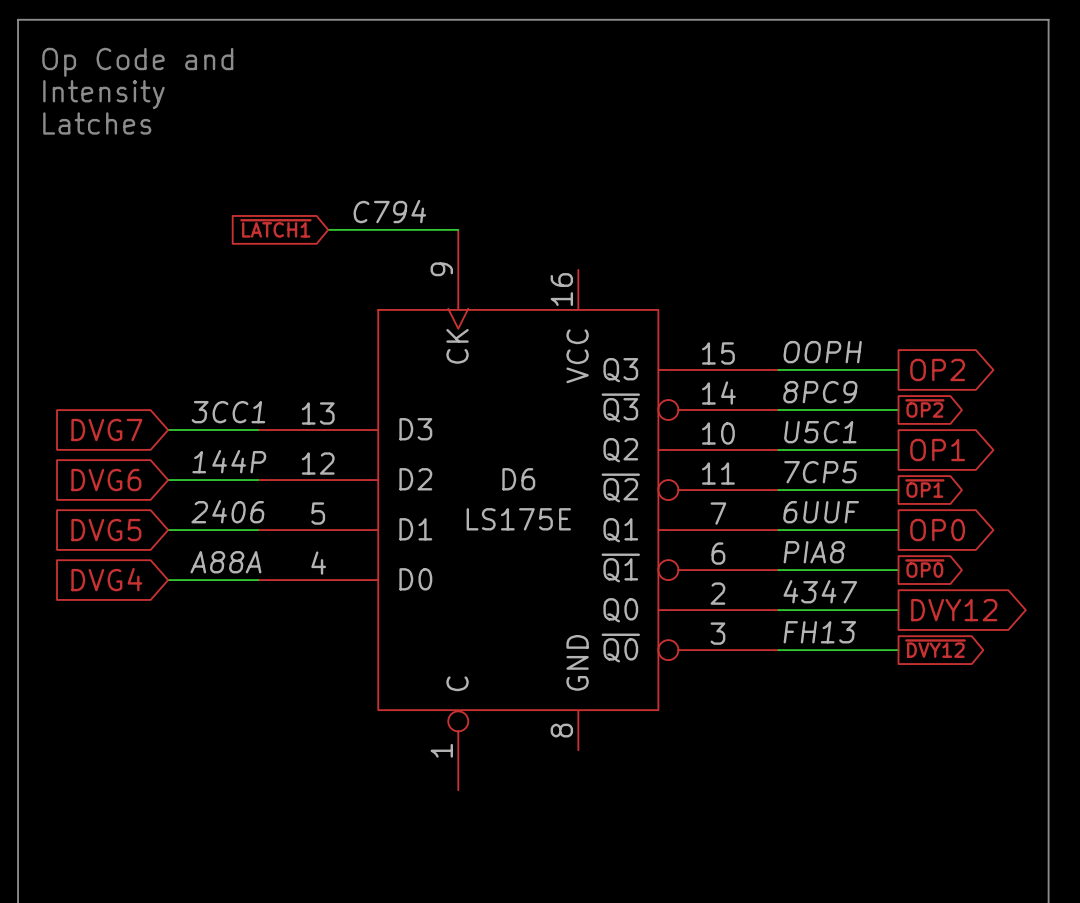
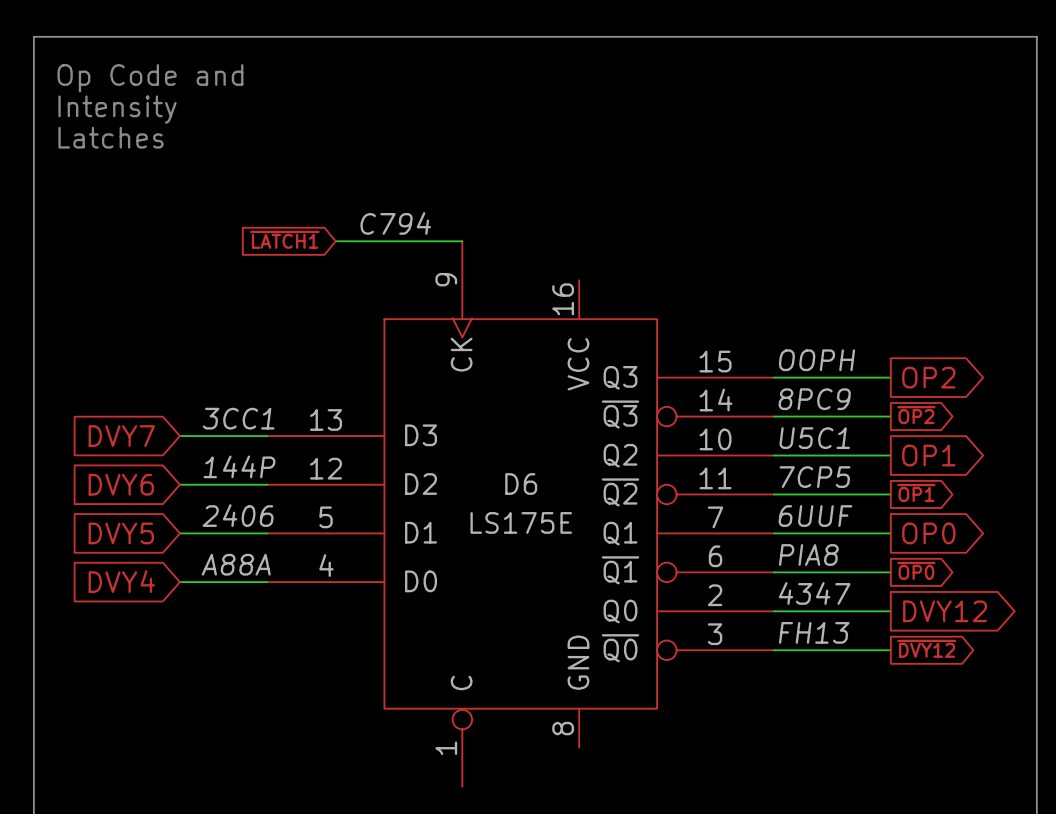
global label: DVG7 (106, 430) -> DVY7 (121, 436)
global label: DVG6 (106, 480) -> DVY6 (121, 484)
global label: DVG5 (106, 530) -> DVY5 (121, 533)
global label: DVG4 (106, 579) -> DVY4 (121, 581)

